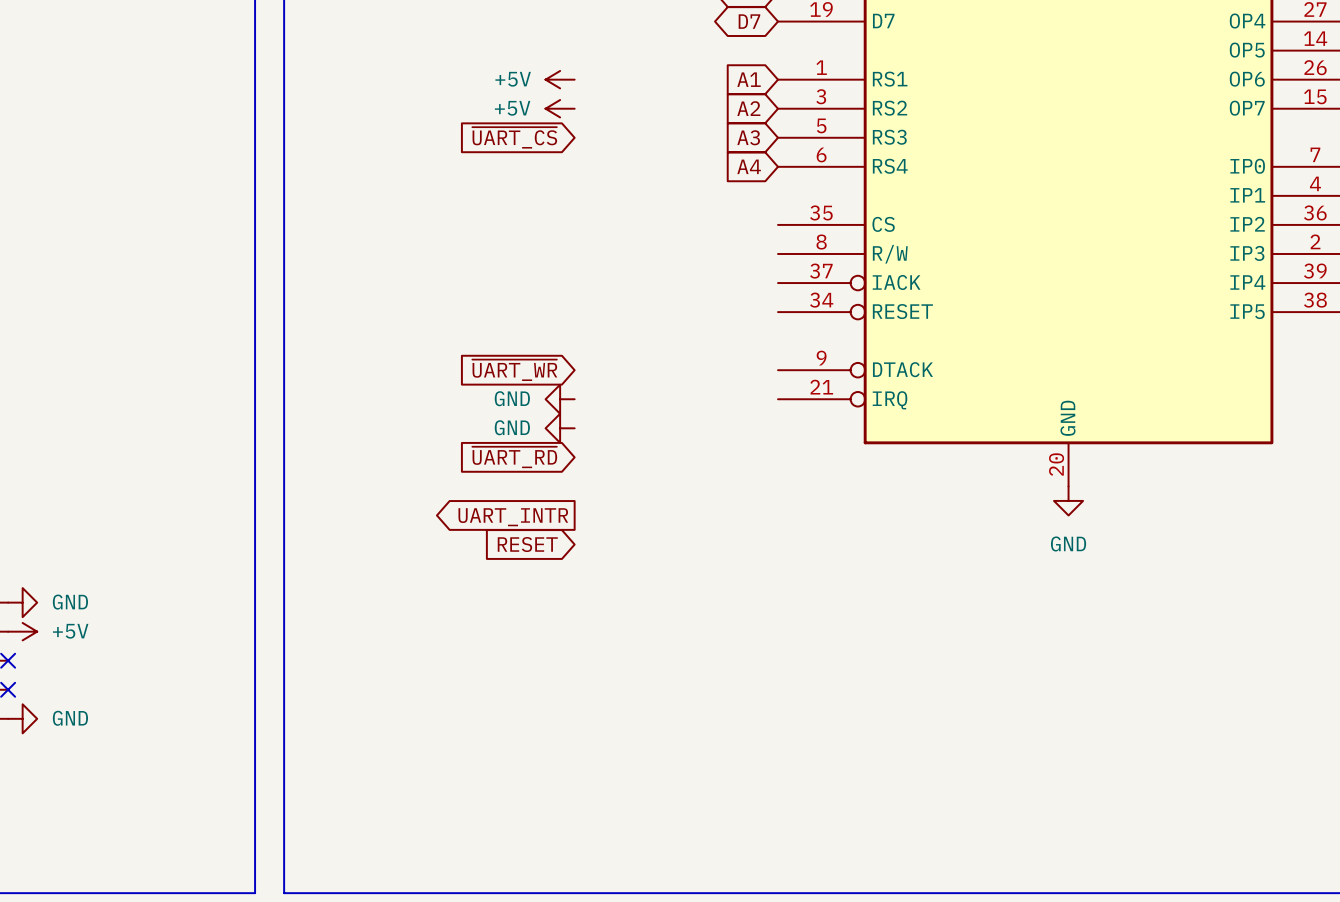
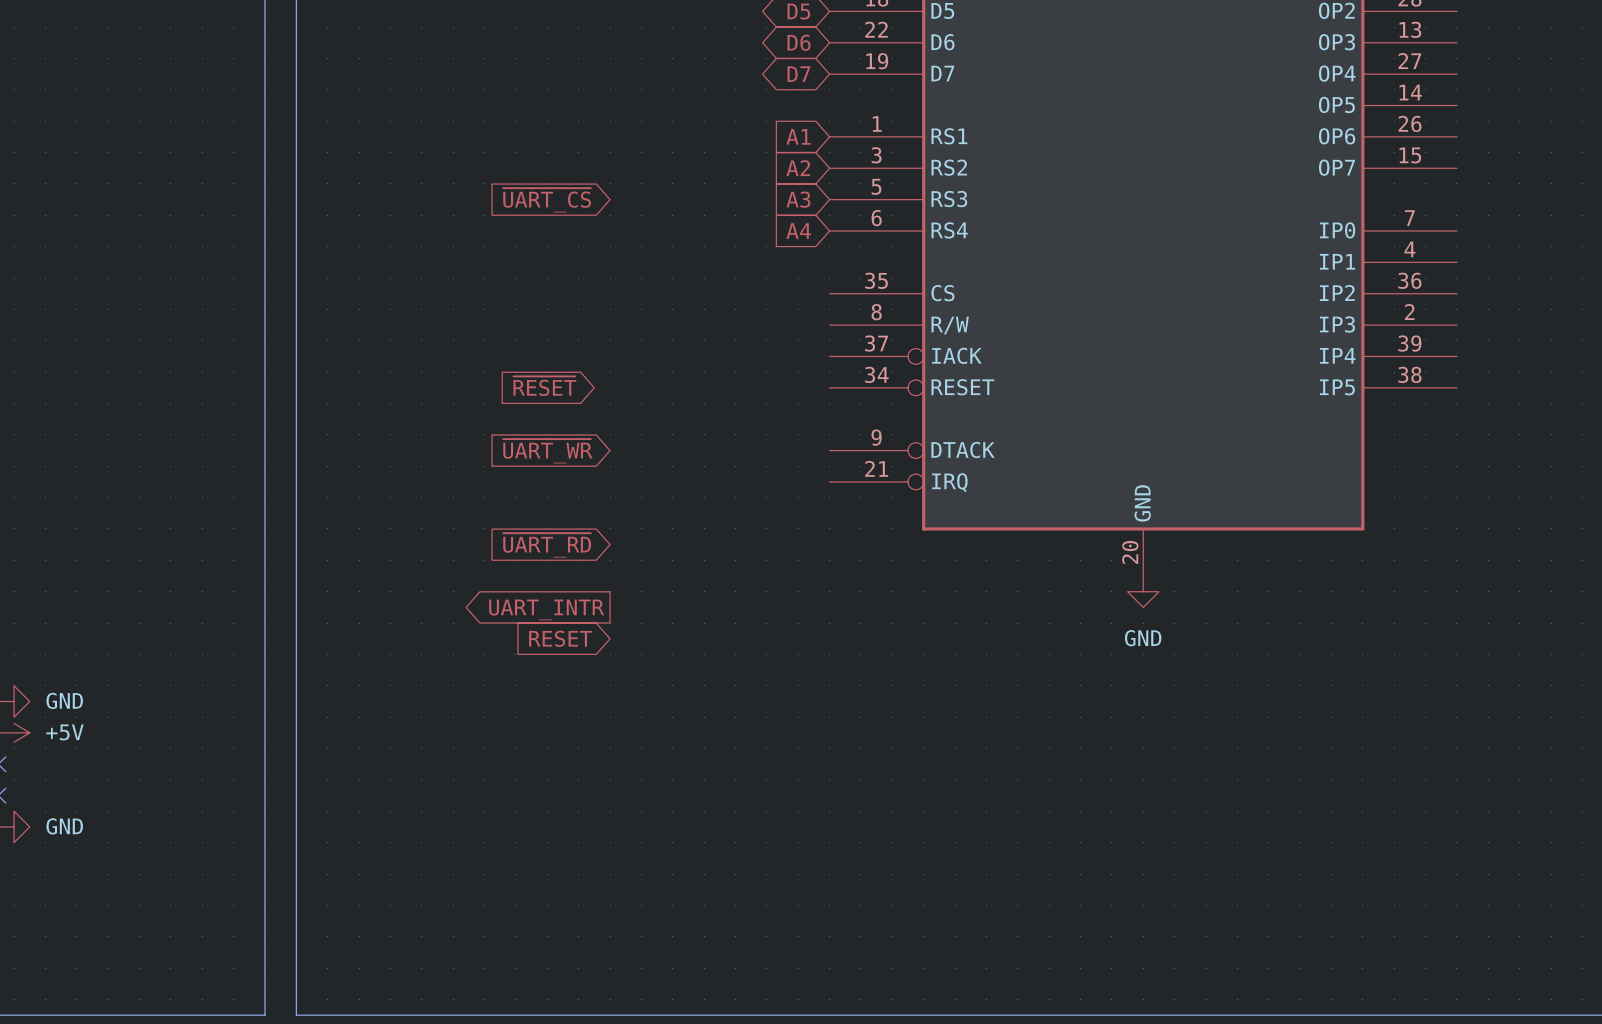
power symbol: +5V (560, 79) -> none
power symbol: +5V (560, 108) -> none
global label: none -> ~{RESET} (544, 386)
power symbol: GND (560, 399) -> none
power symbol: GND (560, 428) -> none

